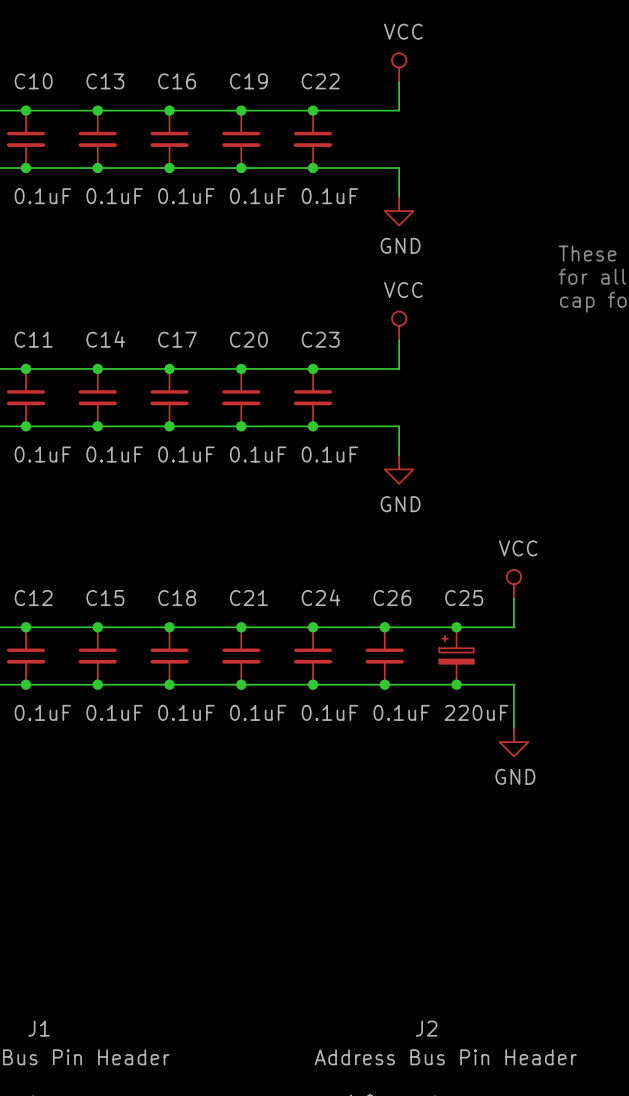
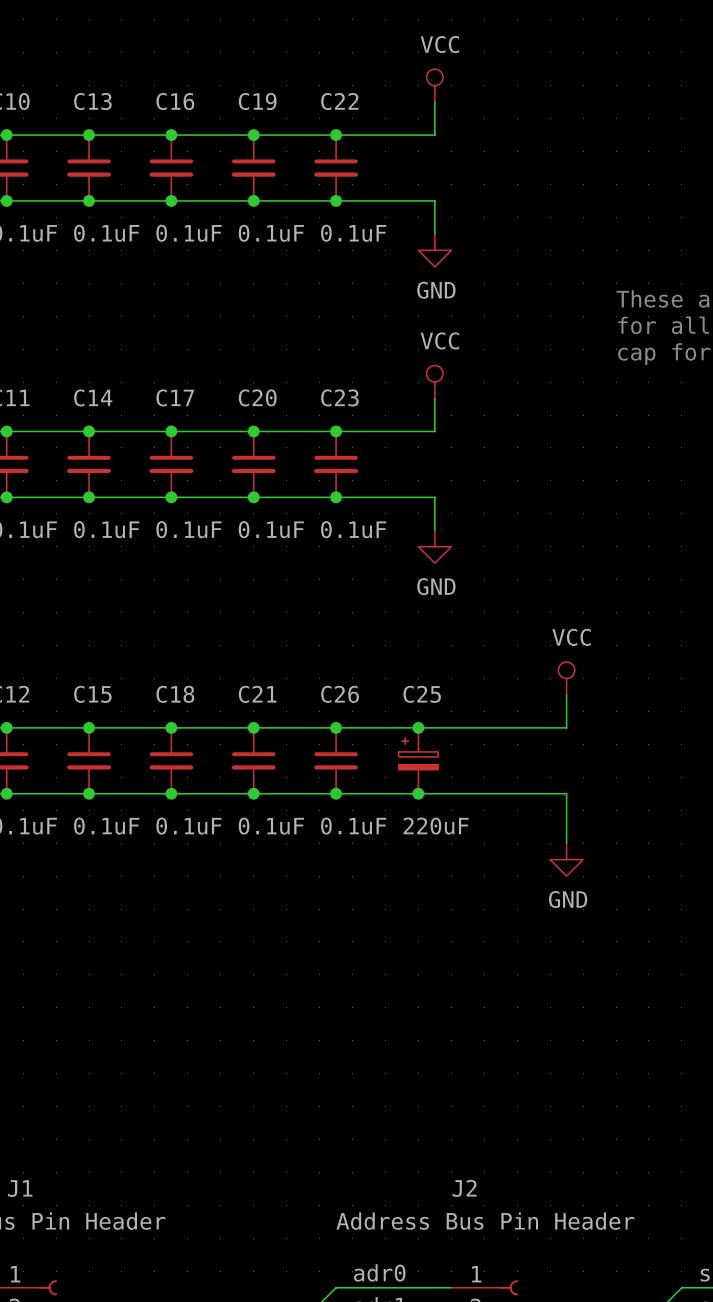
C24 name: C24 (321, 597) -> C26 (340, 694)
junction: (456, 627) -> none
C26: 0.1uF (384, 655) -> none
C25 position: (456, 655) -> (418, 760)
junction: (456, 684) -> none

